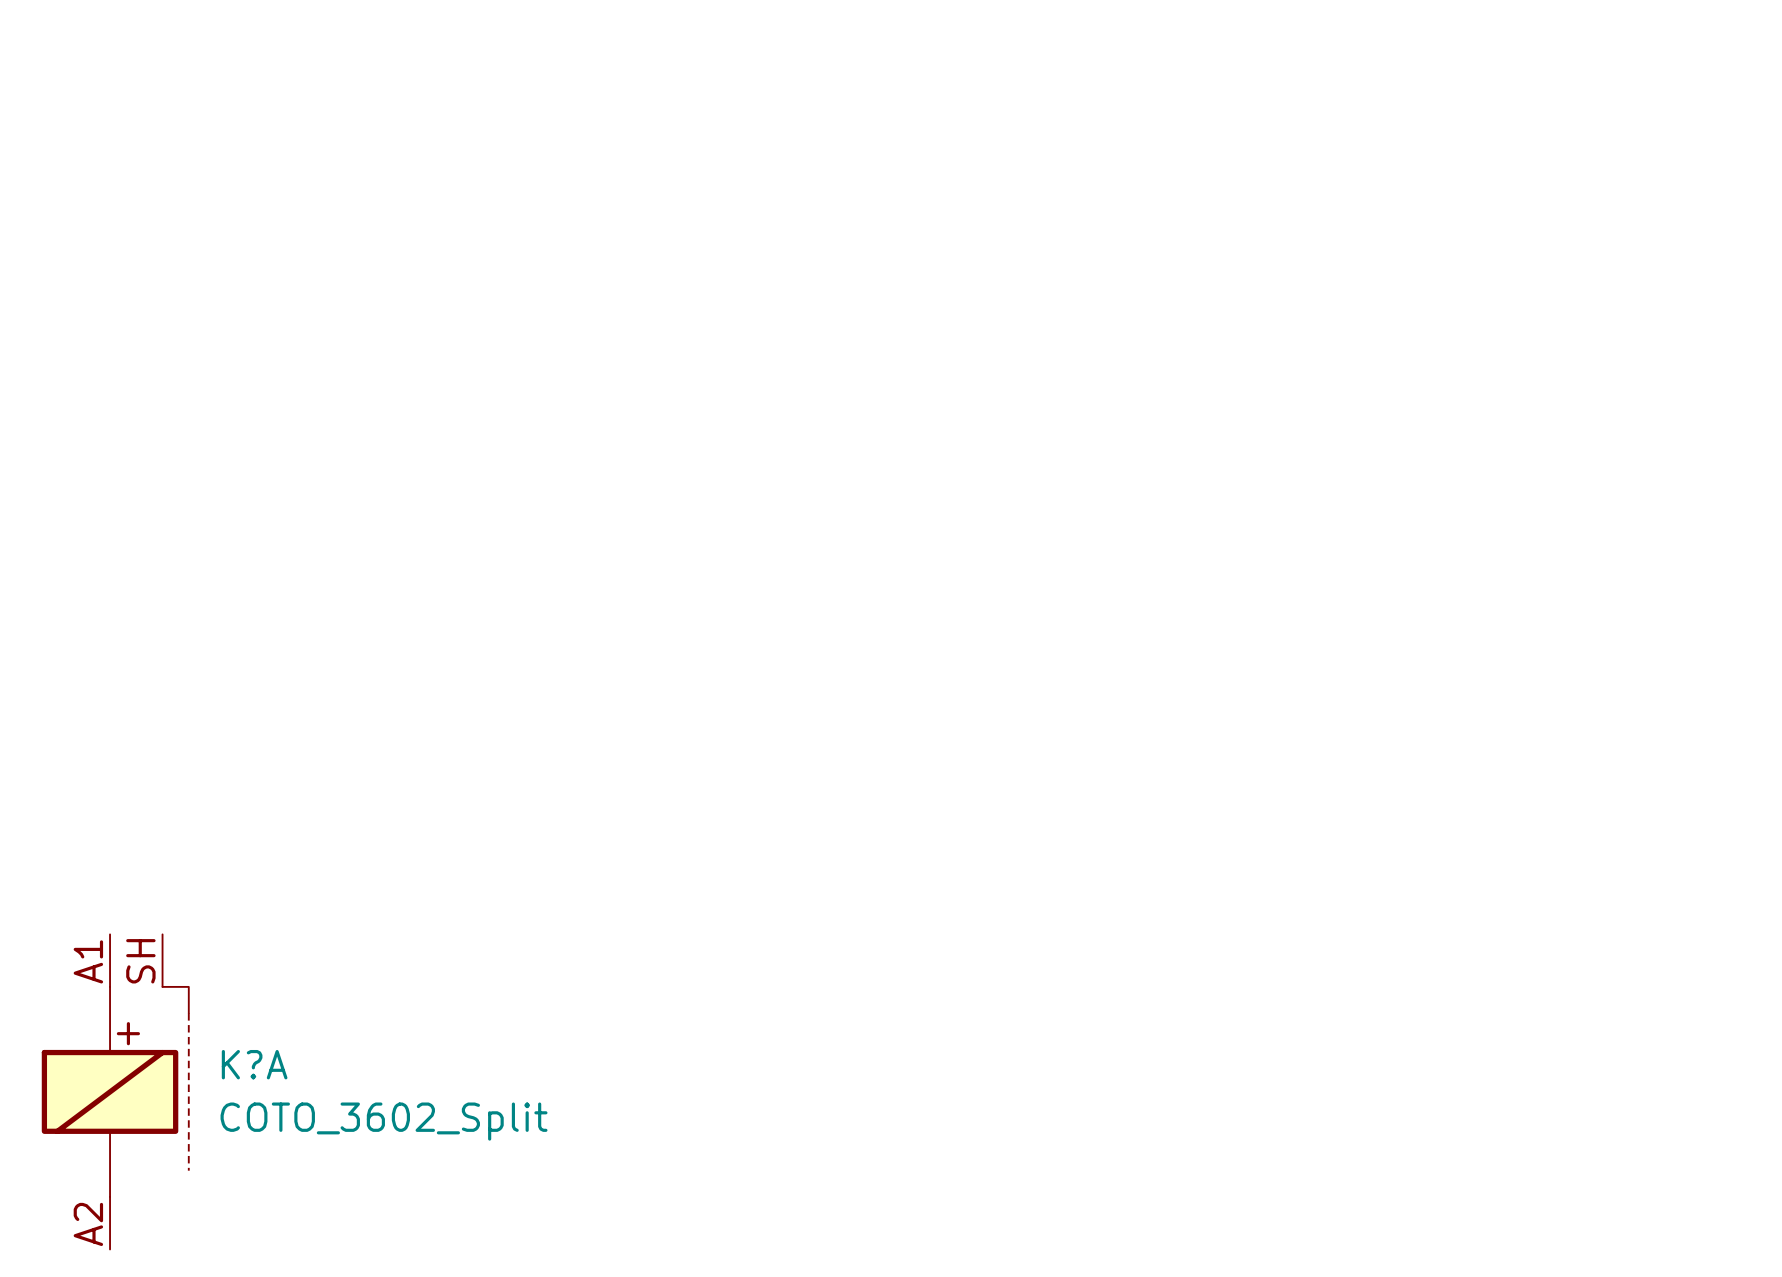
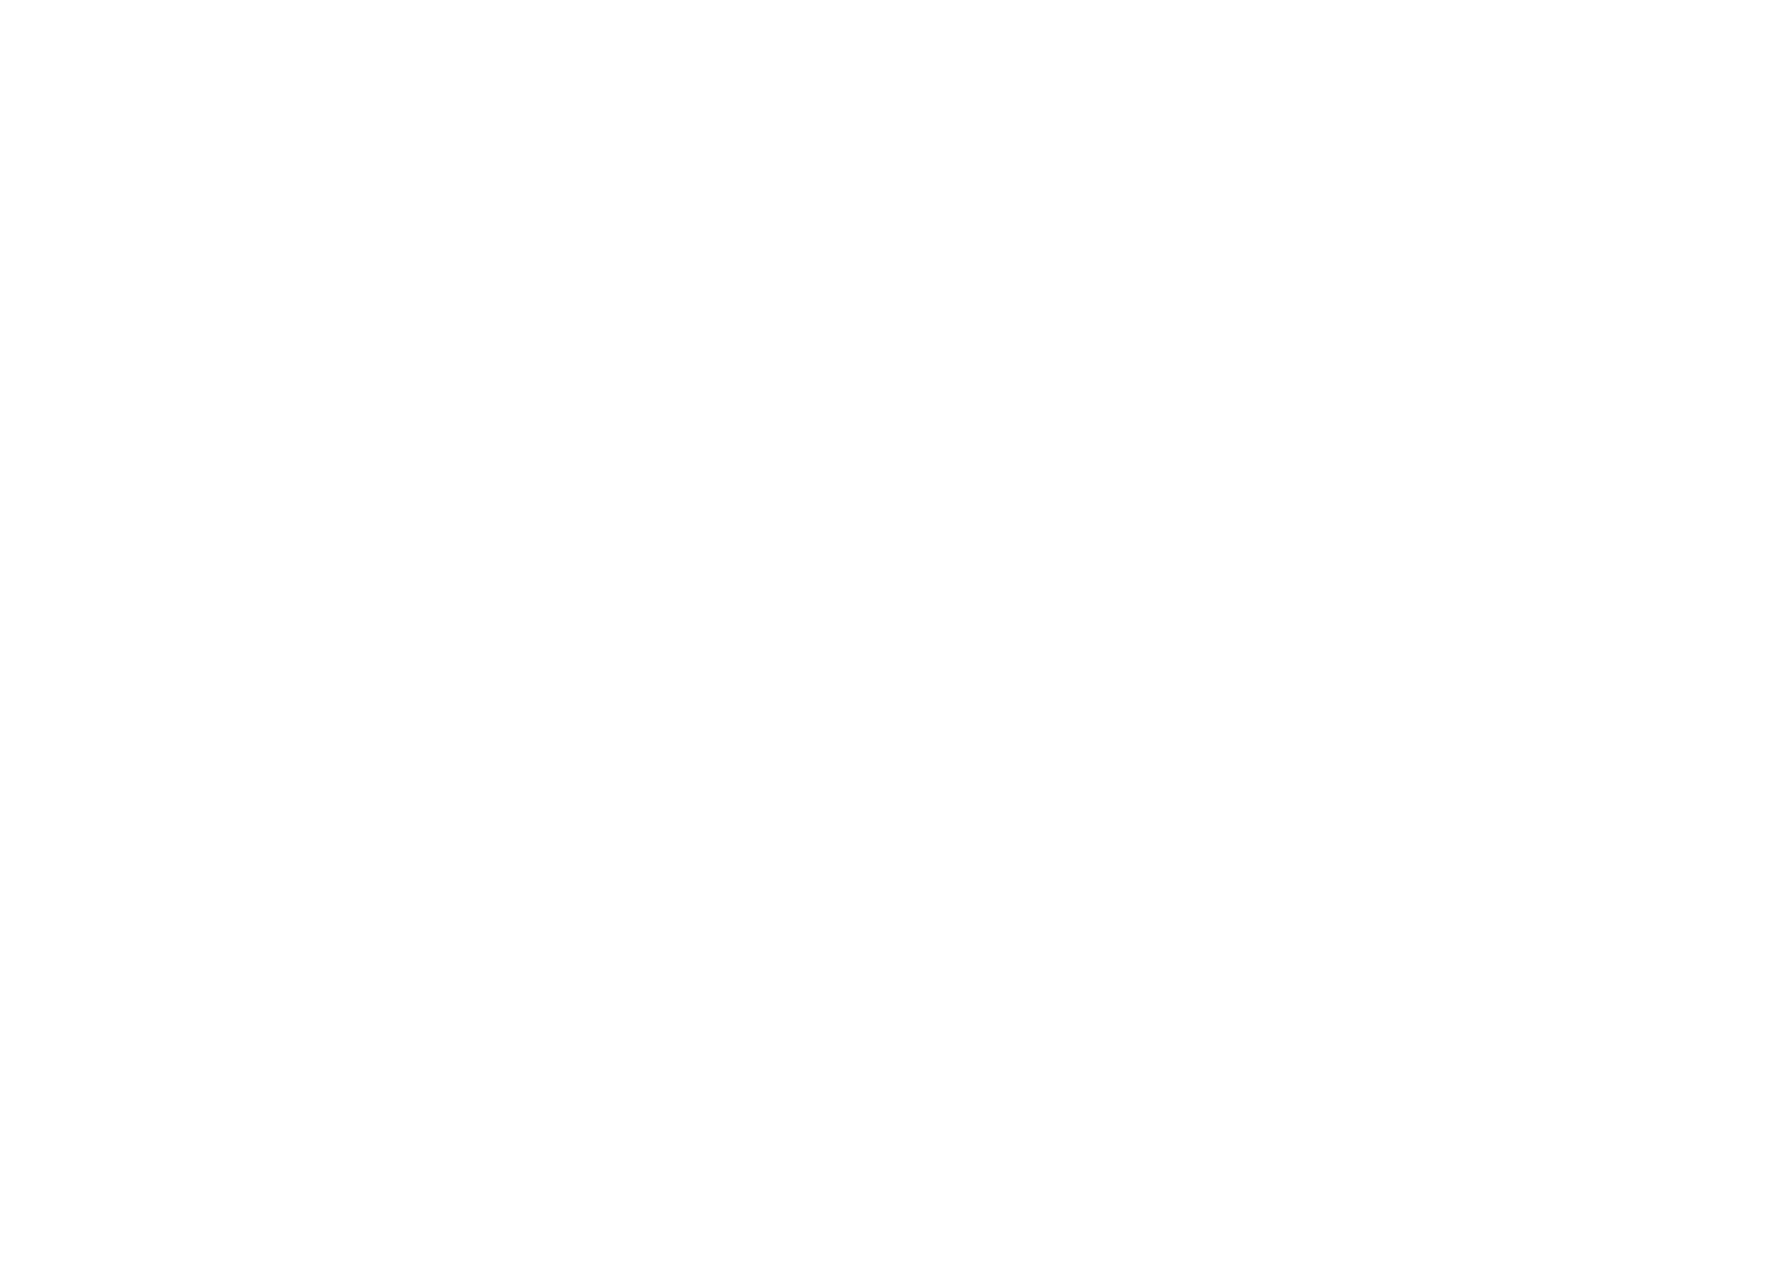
K?A: COTO_3602_Split (115, 1091) -> none

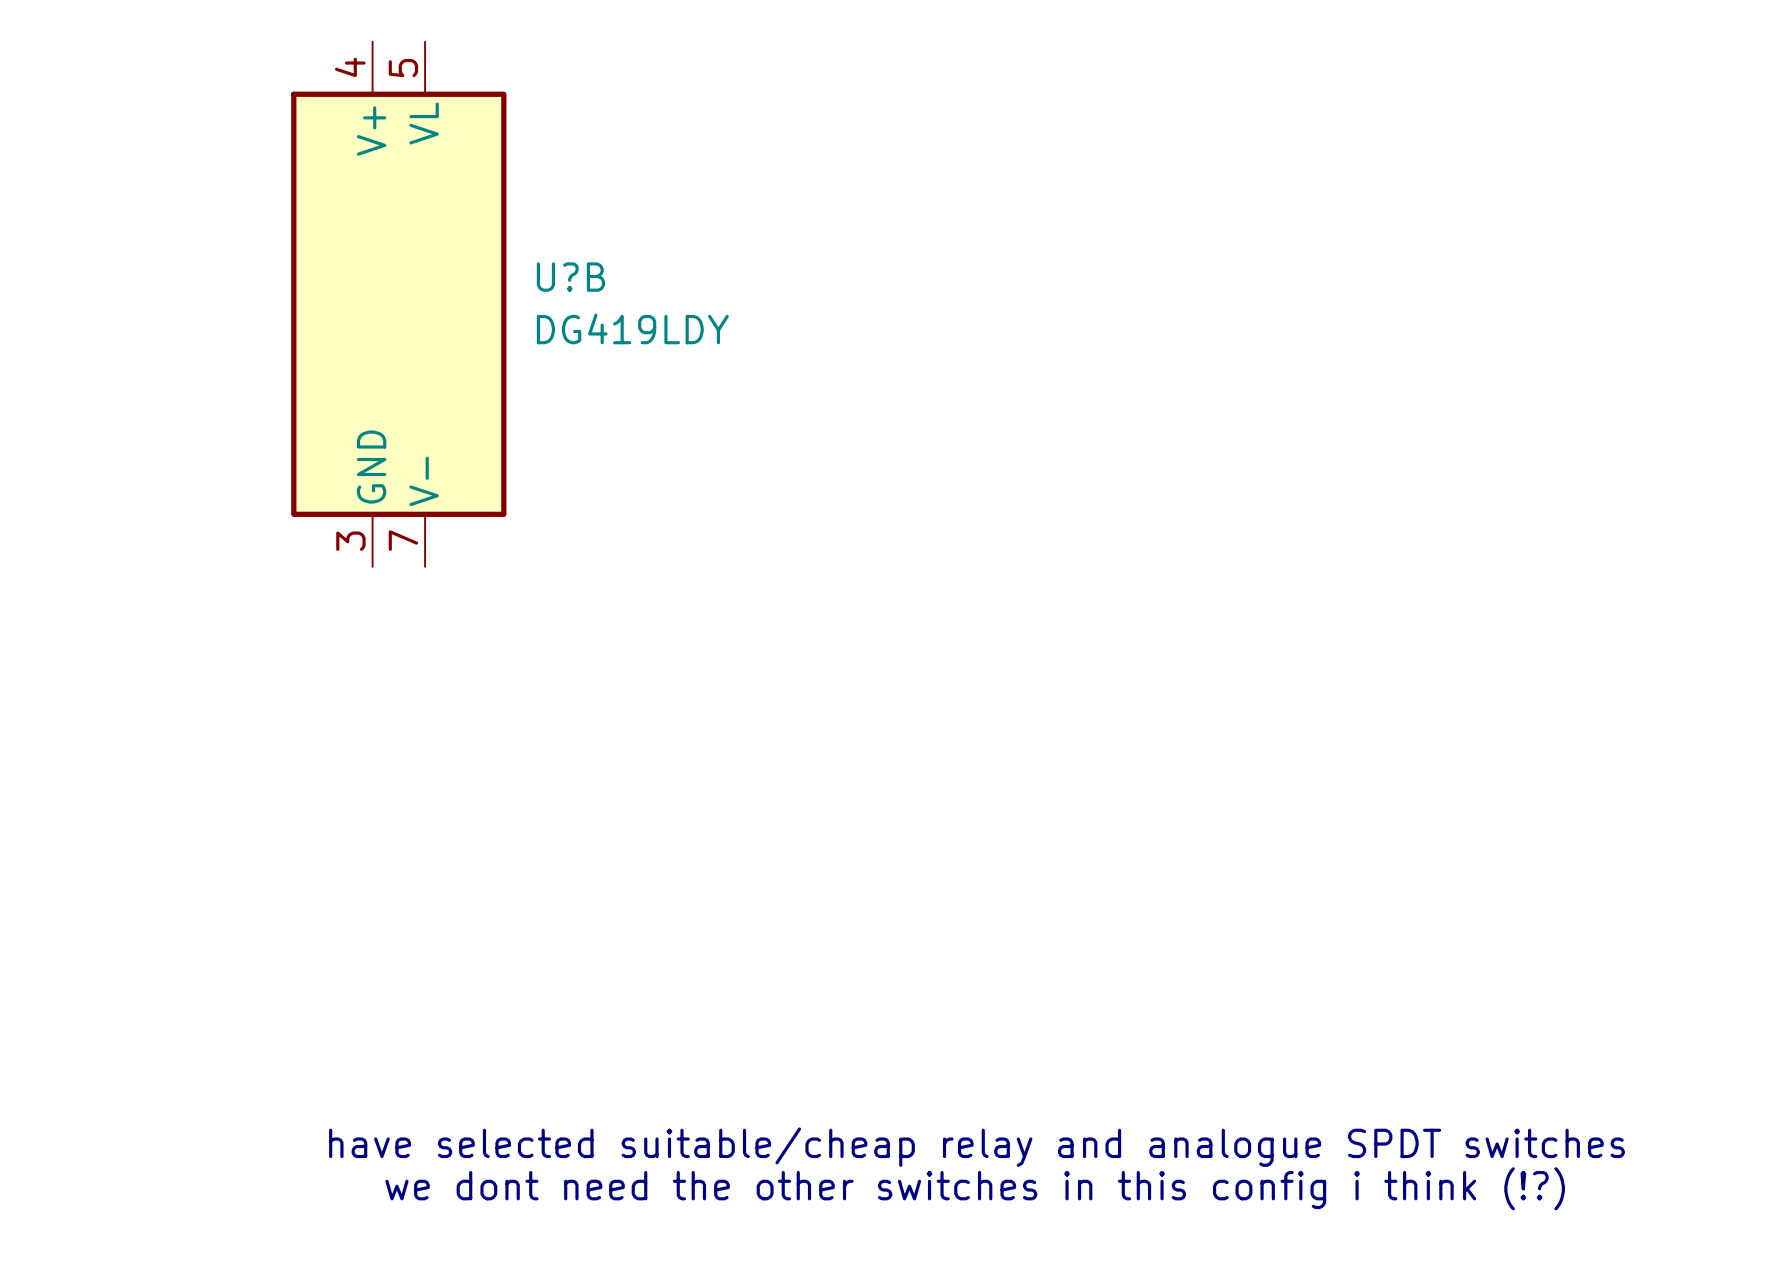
U?B: none -> DG419LDY (398, 304)
text: none -> have selected suitable/cheap relay and analogue SPDT switches (977, 1147)
text: none -> we dont need the other switches in this config i think (!?) (975, 1188)

